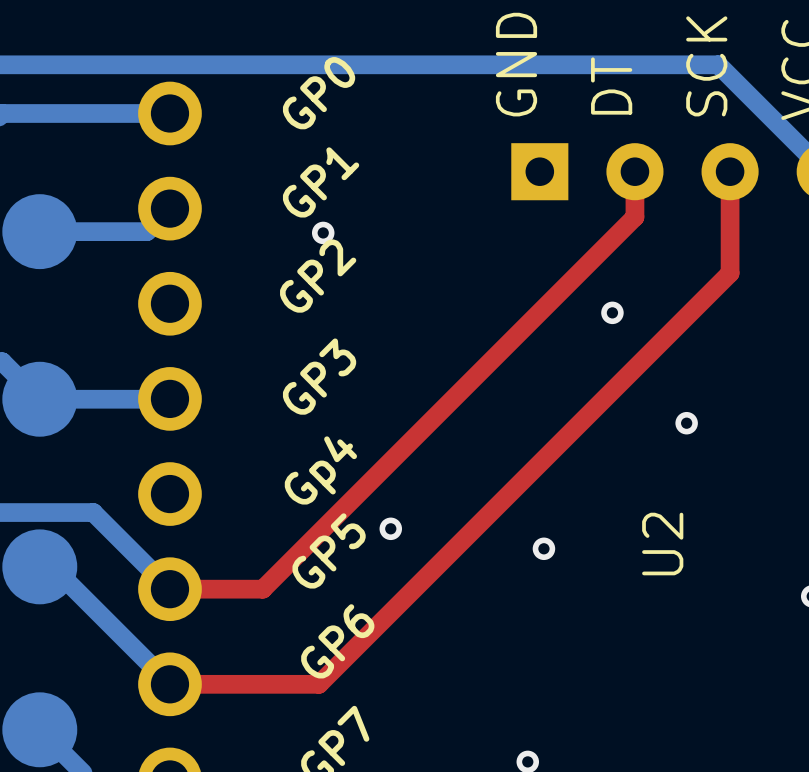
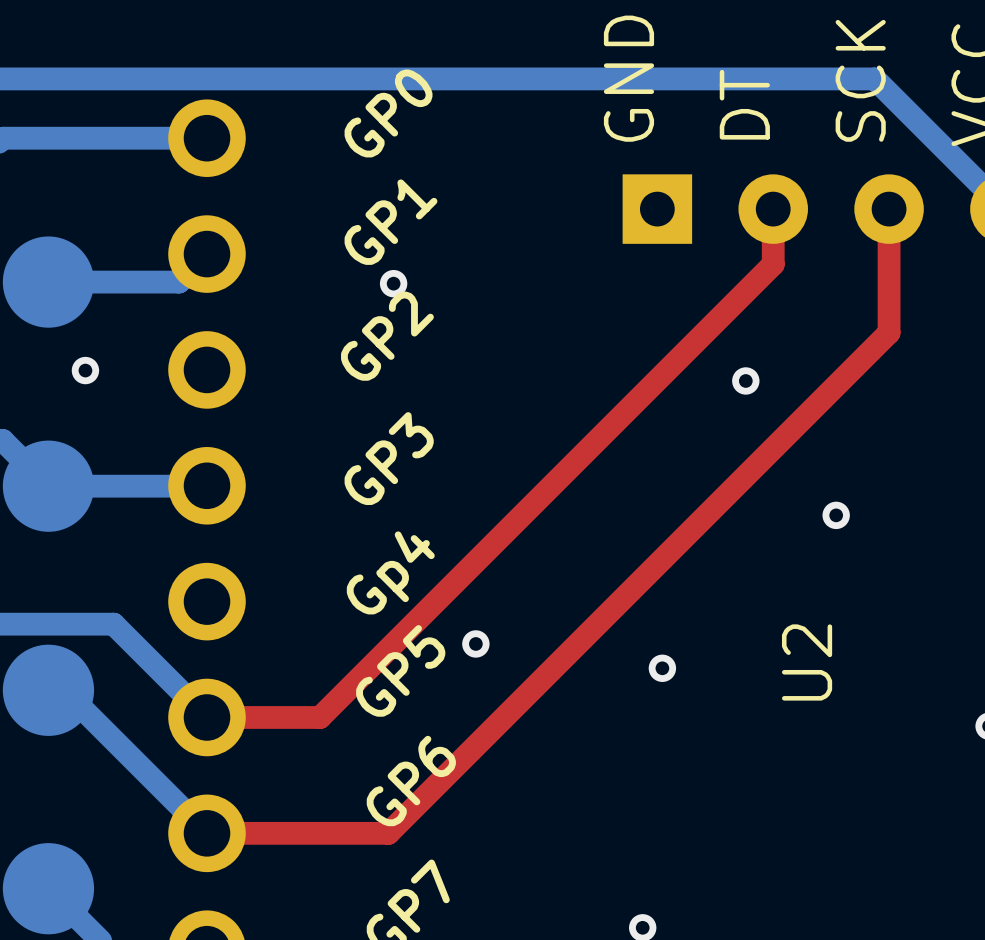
via: none -> (85, 370)

